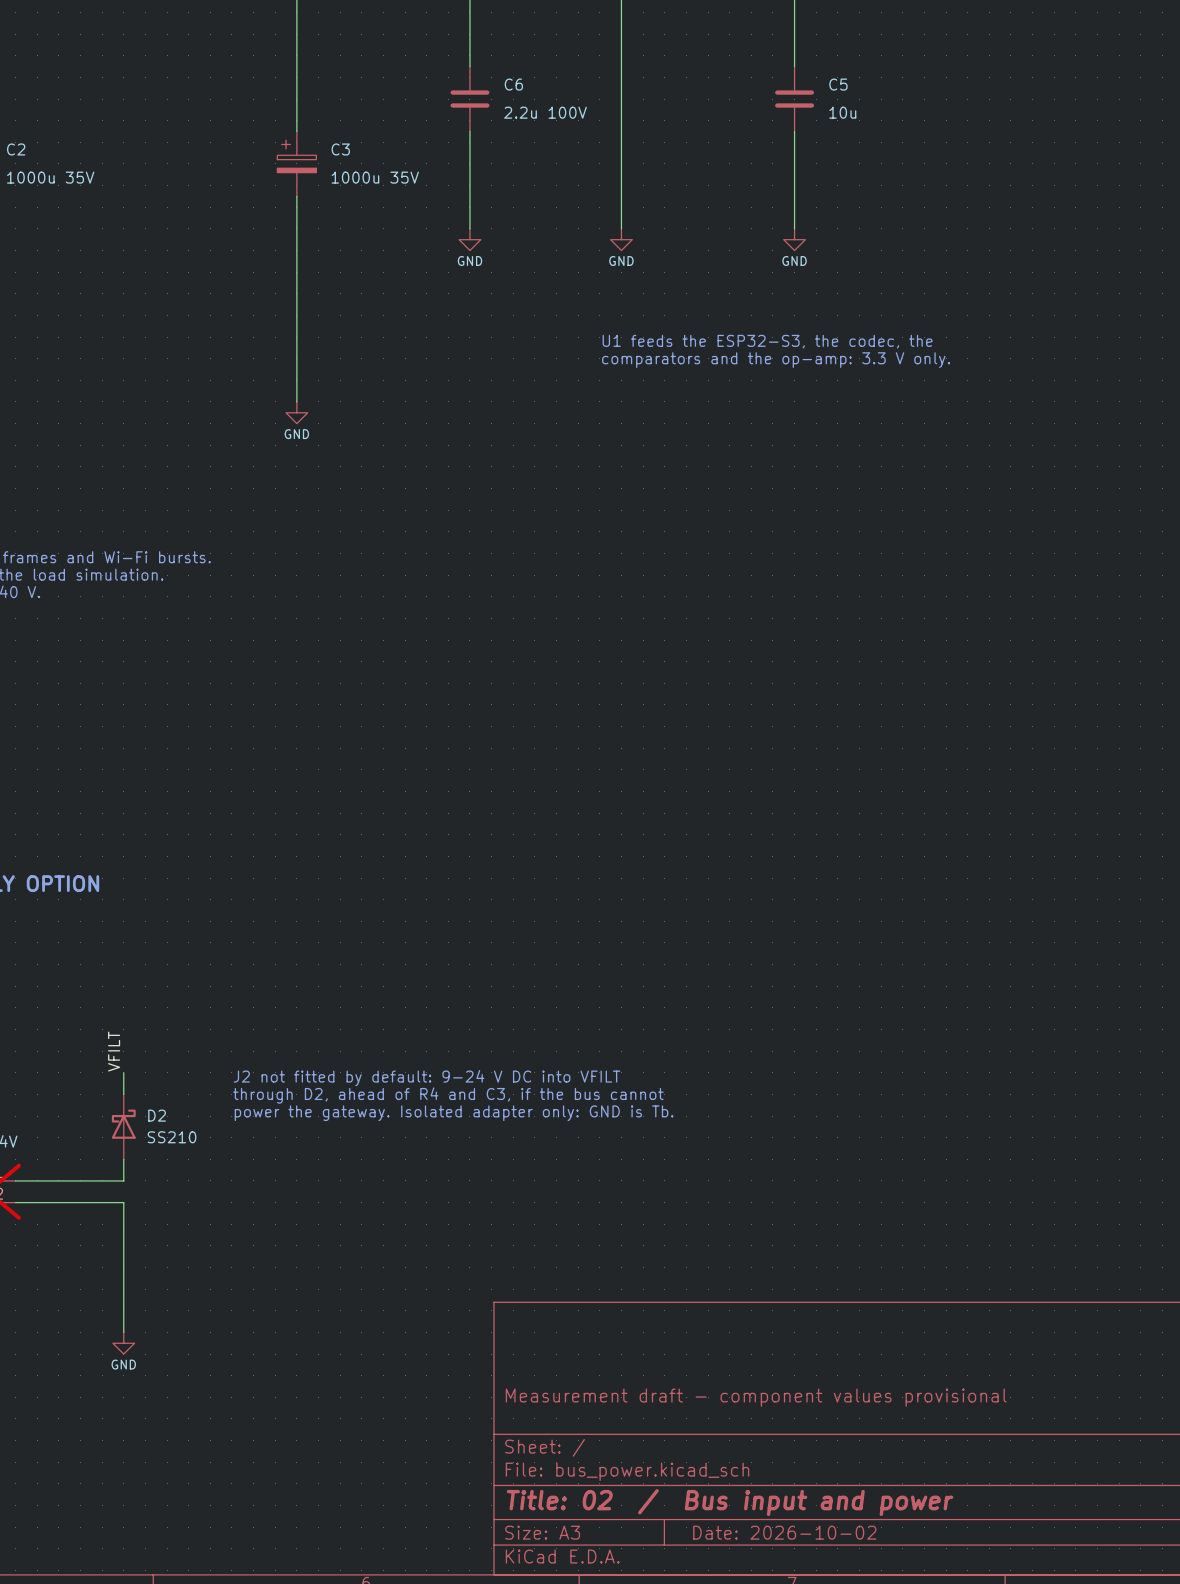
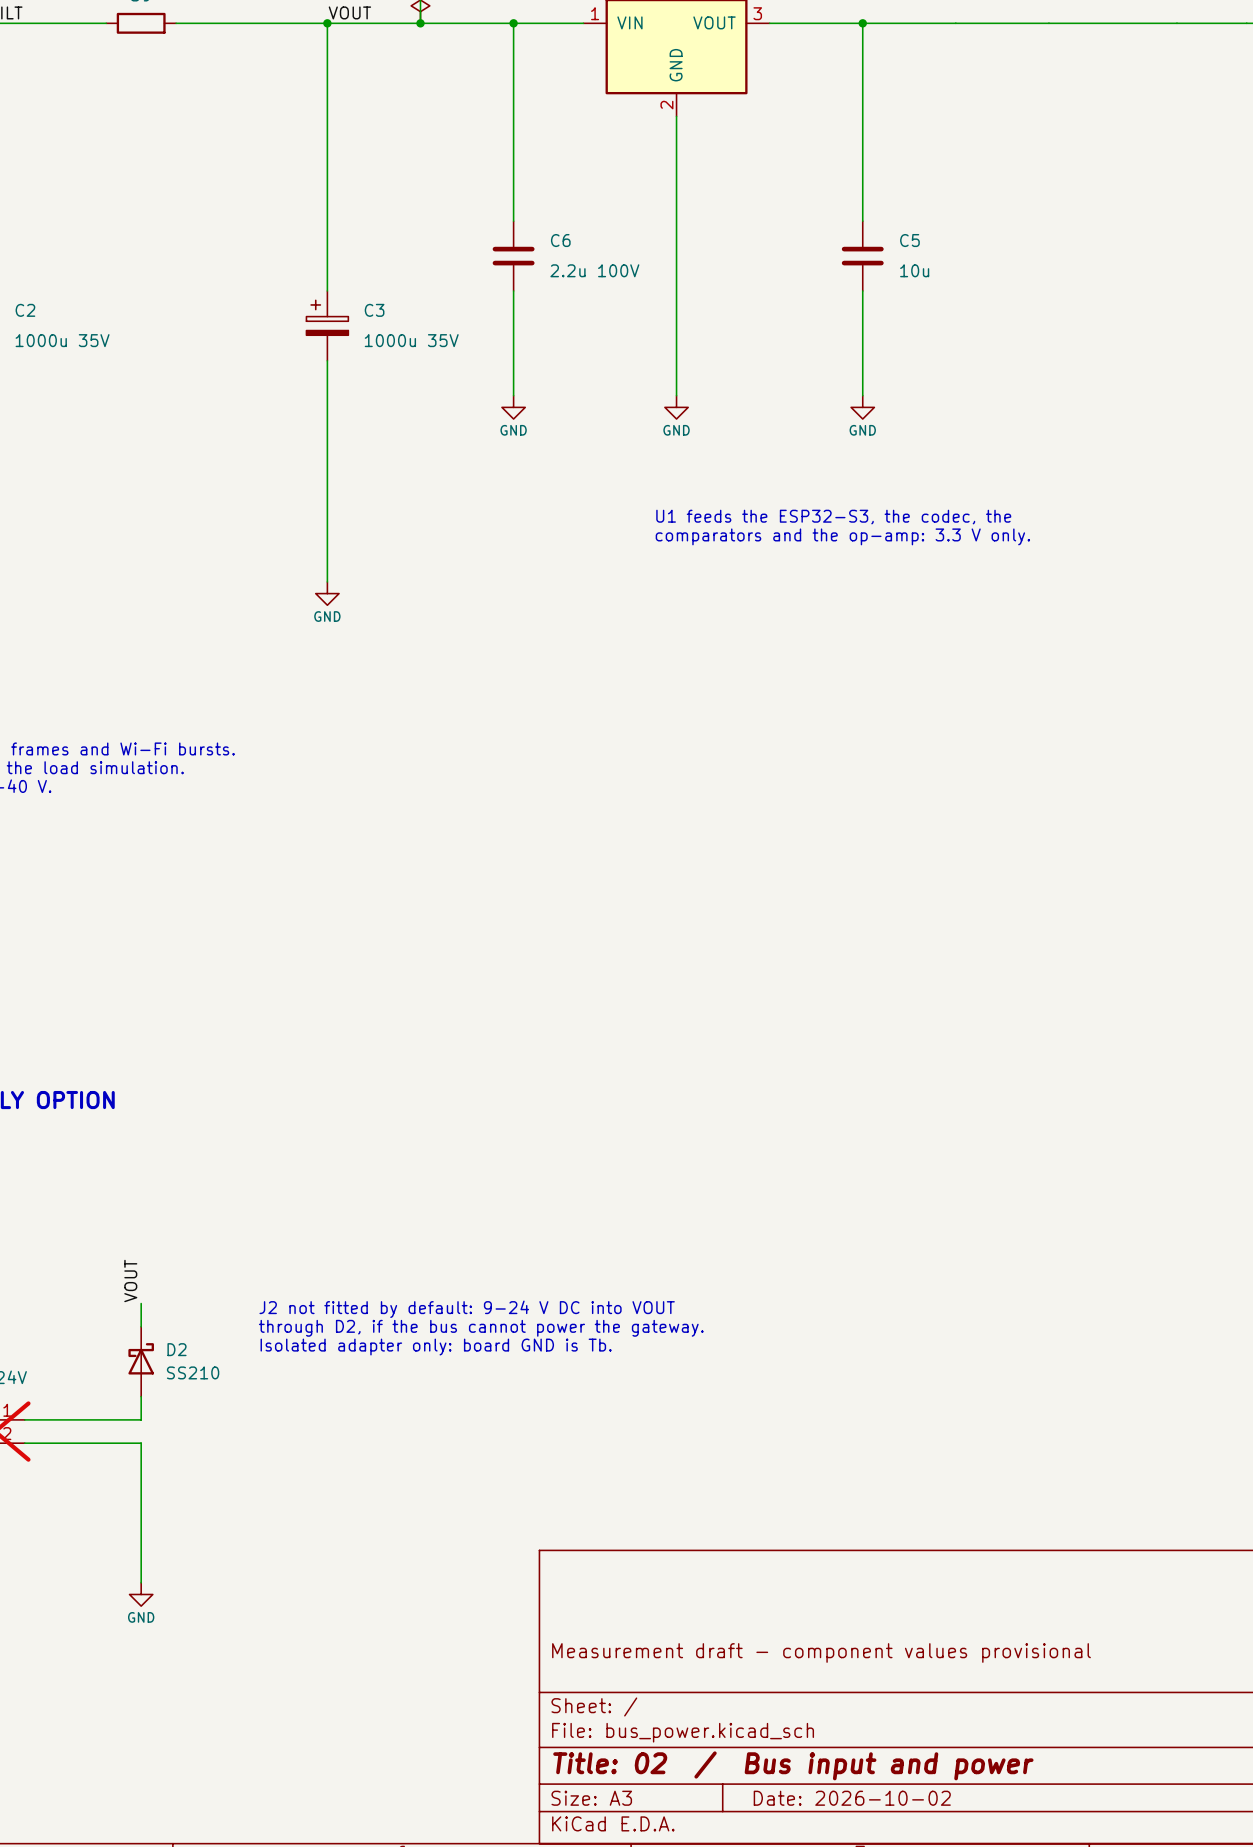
label: VFILT (114, 1051) -> VOUT (130, 1280)
text: J2 not fitted by default: 9-24 V DC into VFILT (427, 1078) -> J2 not fitted by default: 9-24 V DC into VOUT (467, 1309)
text: through D2, ahead of R4 and C3, if the bus cannot (448, 1095) -> through D2, if the bus cannot power the gateway. (481, 1328)
text: power the gateway. Isolated adapter only: GND is Tb. (454, 1113) -> Isolated adapter only: board GND is Tb. (436, 1347)

